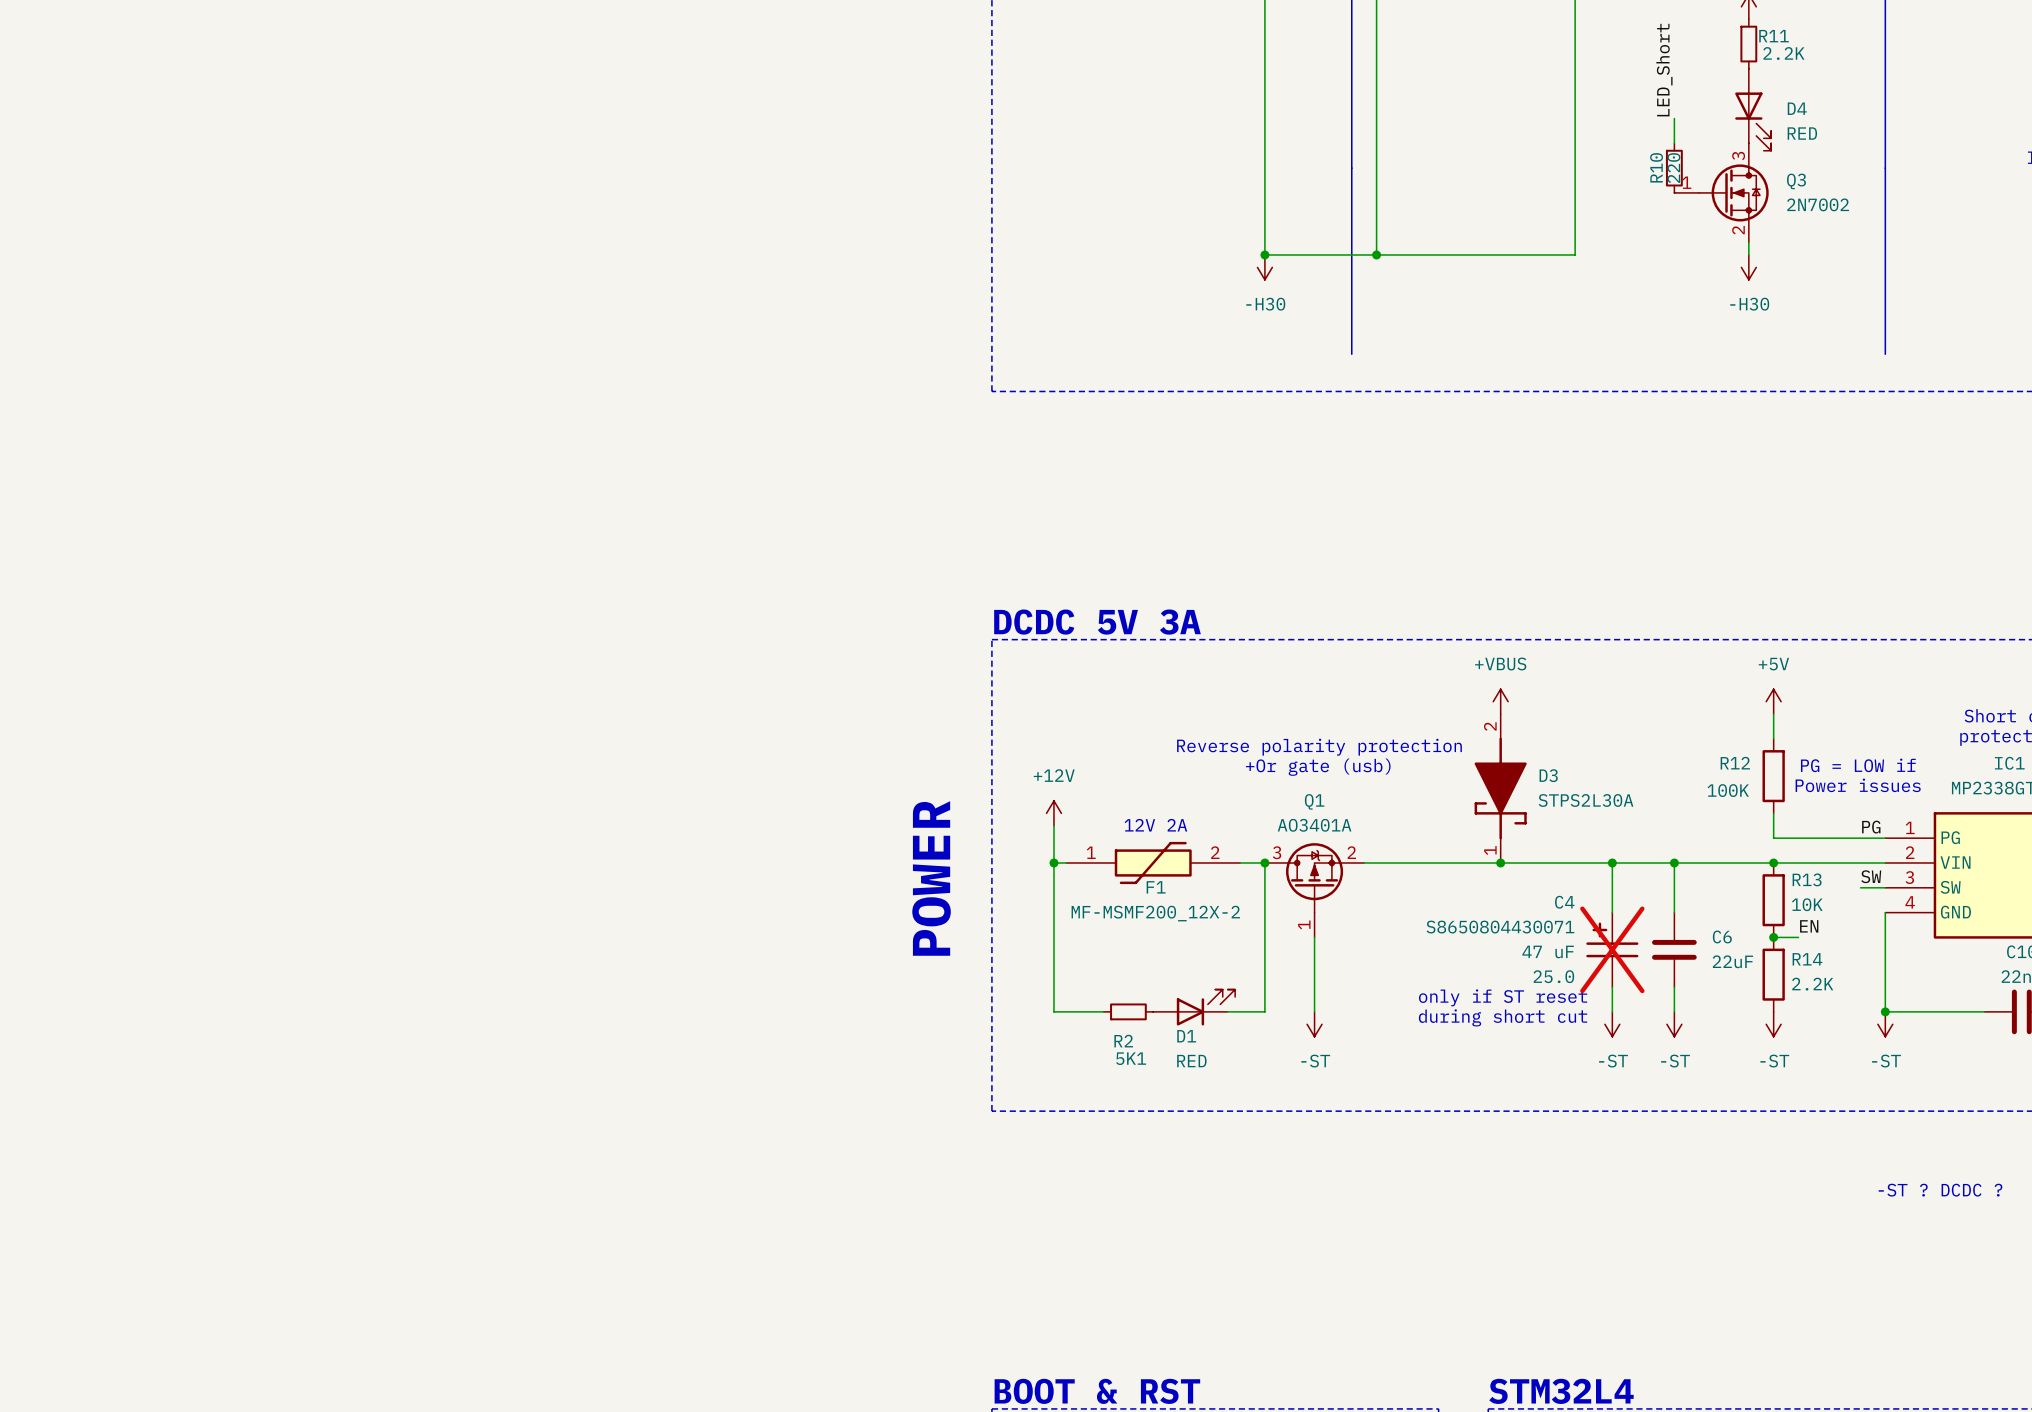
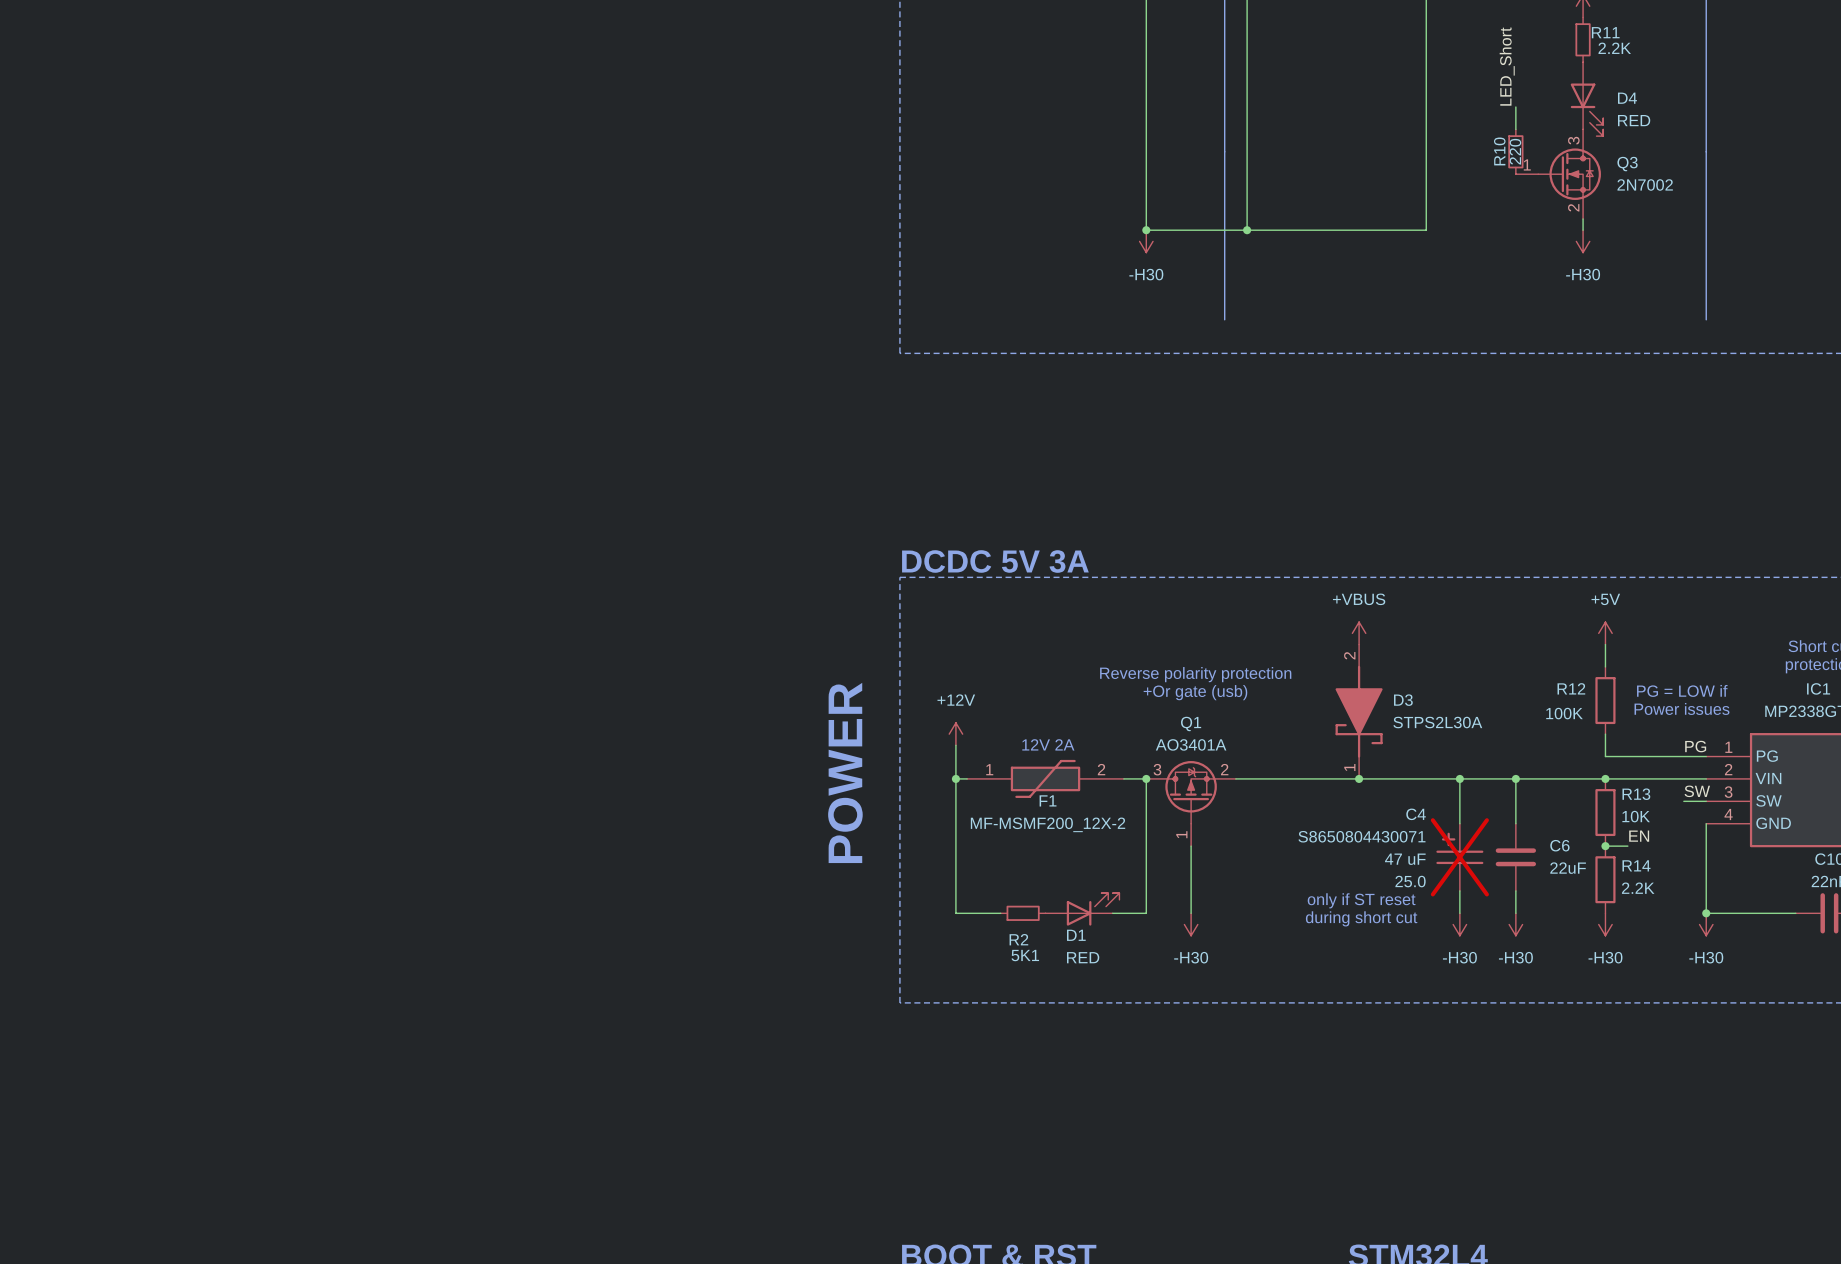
power symbol: -ST (1314, 1024) -> -H30 (1191, 924)
power symbol: -ST (1612, 1024) -> -H30 (1459, 924)
power symbol: -ST (1674, 1024) -> -H30 (1515, 924)
power symbol: -ST (1773, 1024) -> -H30 (1605, 924)
power symbol: -ST (1885, 1024) -> -H30 (1706, 924)
text: -ST ? DCDC ? (1940, 1190) -> none

